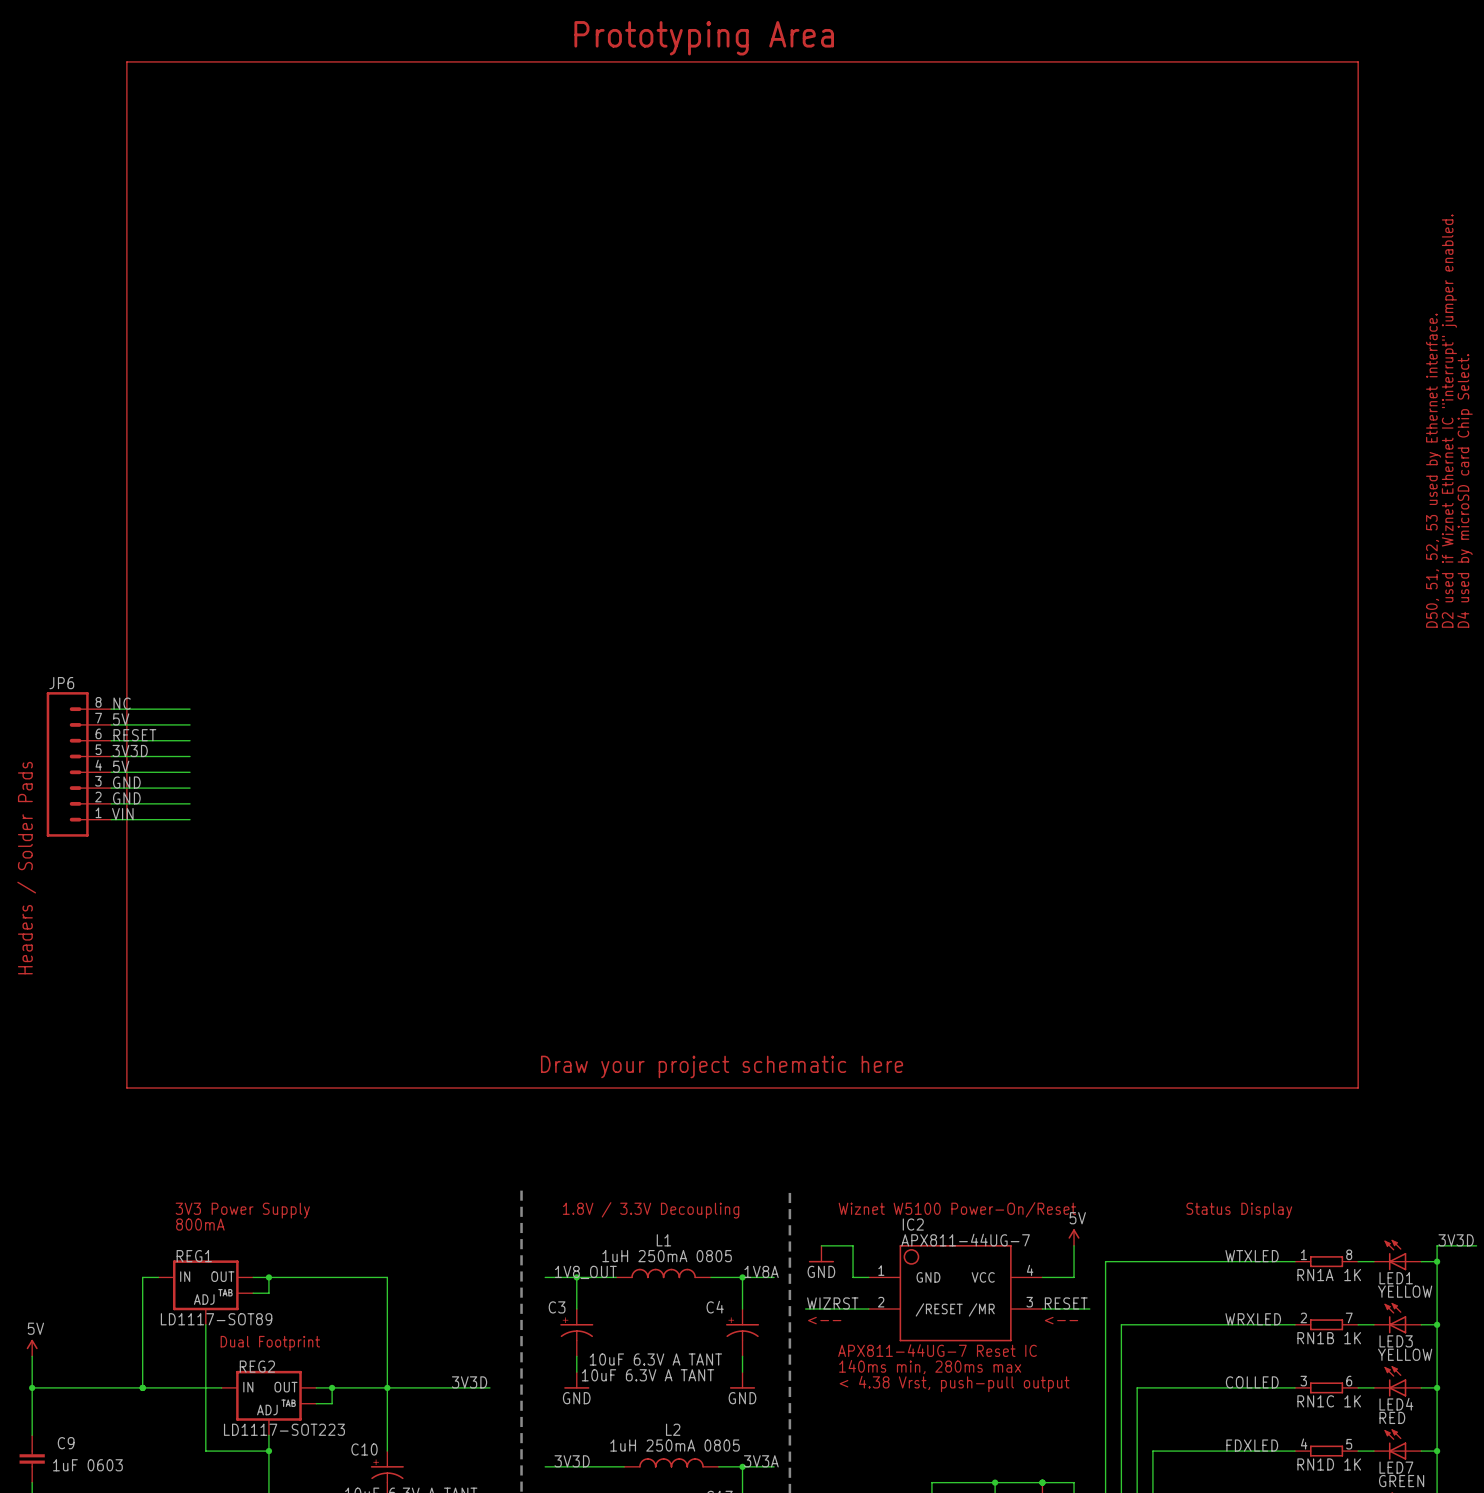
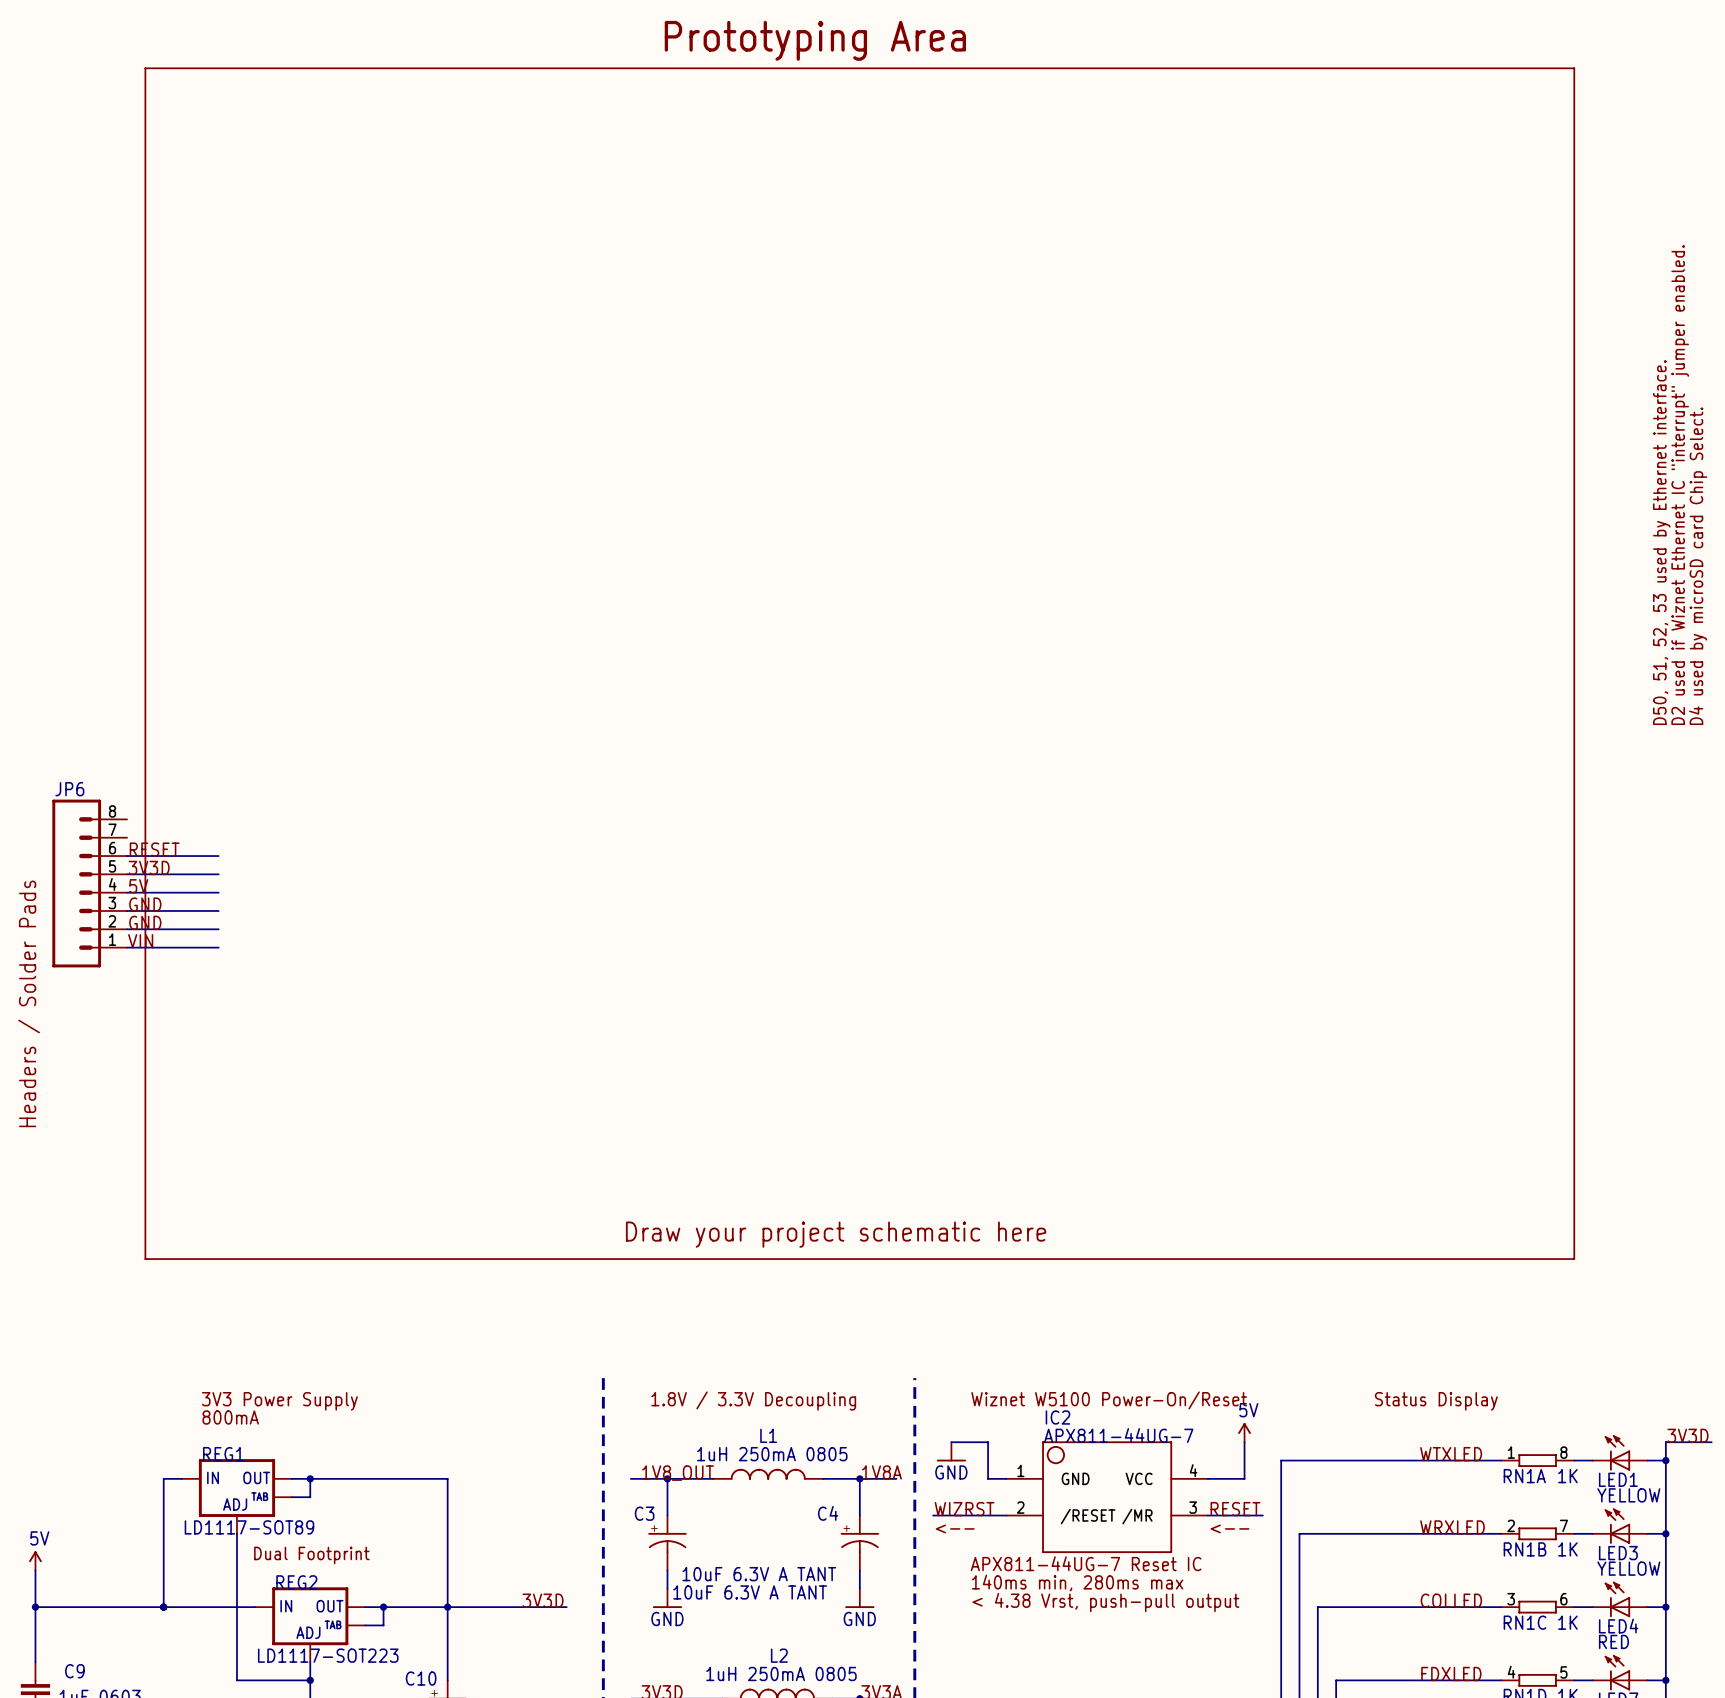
label: NC (122, 703) -> none
wire: (111, 709) (190, 709) -> none
label: 5V (121, 719) -> none
wire: (111, 724) (190, 724) -> none

